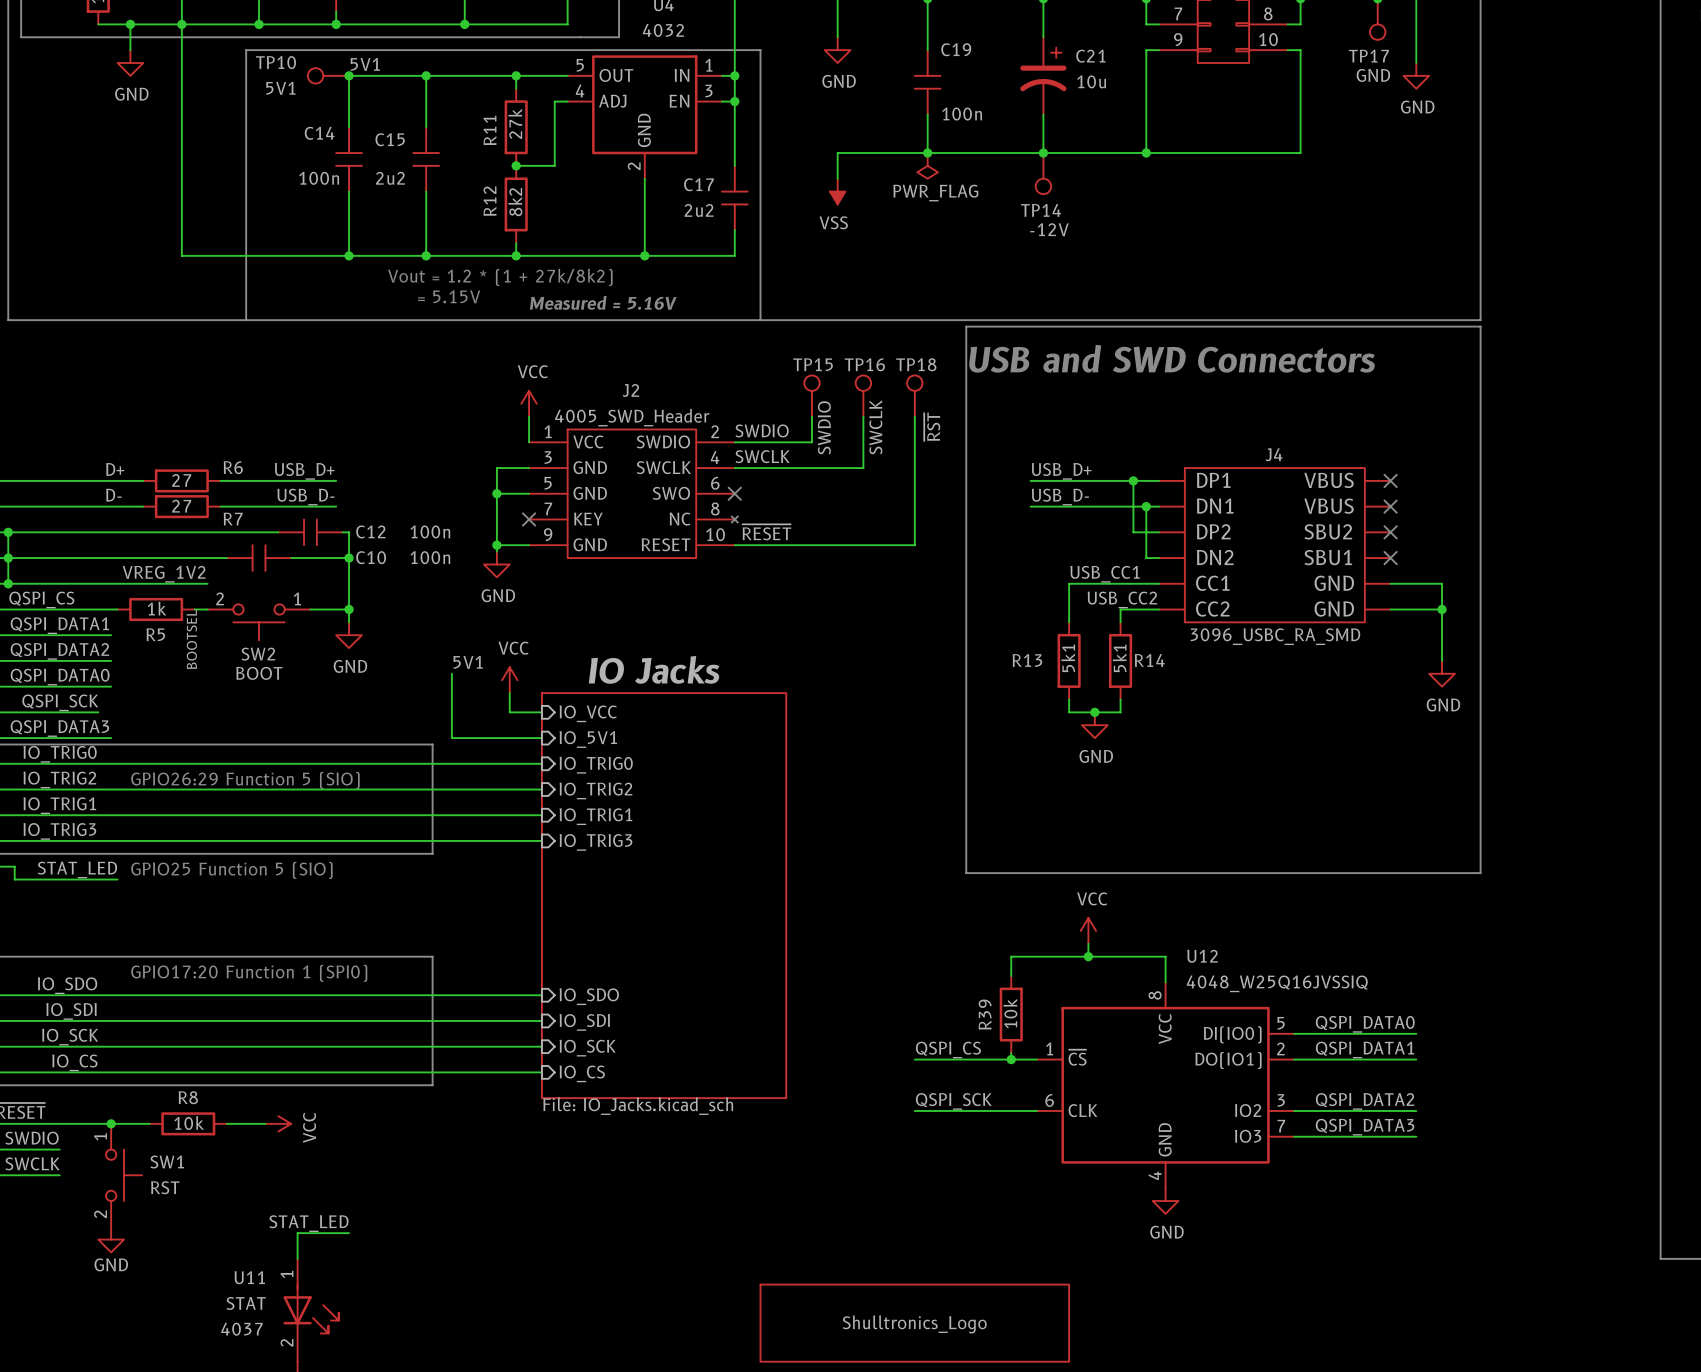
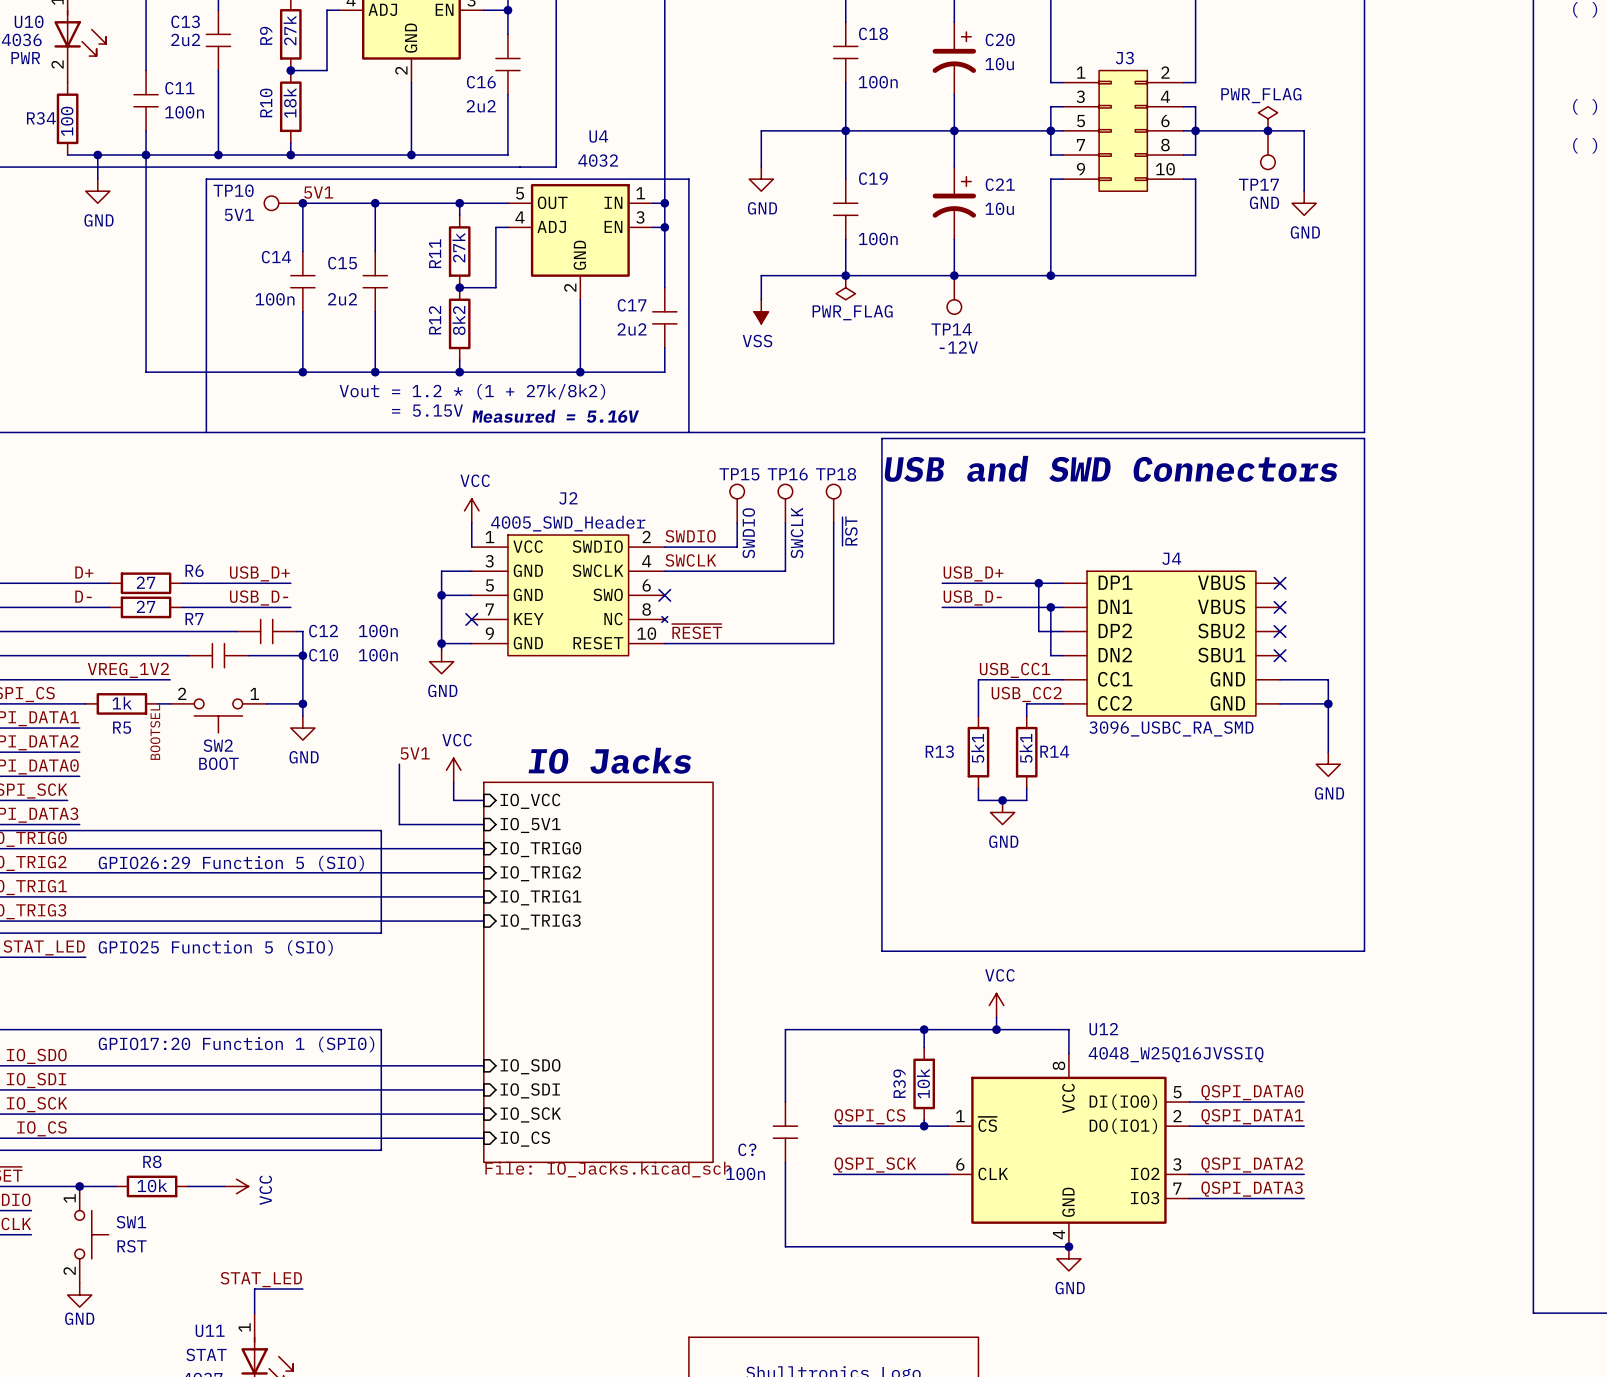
wire: none -> (924, 1029) (785, 1029) (785, 1102)
junction: none -> (924, 1029)
C?: none -> (785, 1132)
wire: none -> (785, 1162) (785, 1246) (1068, 1246)
junction: none -> (1068, 1246)

